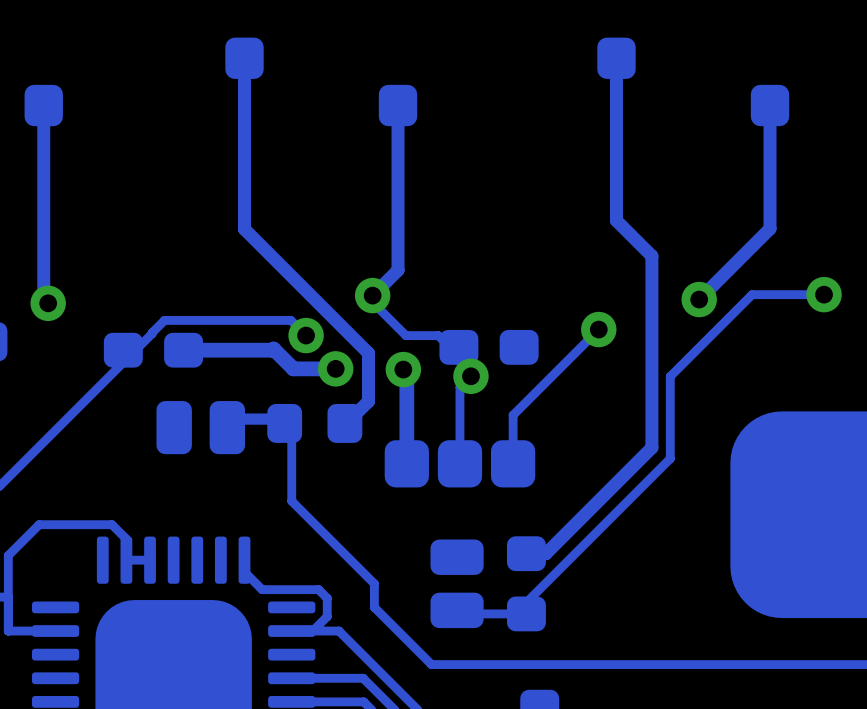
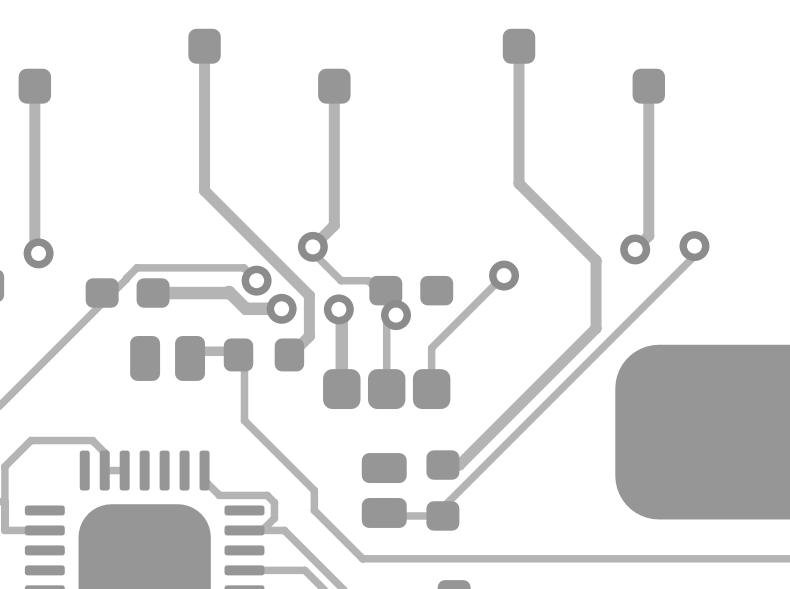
track: (770, 228) (699, 299) -> (648, 190) (648, 235) (635, 249)
track: (651, 256) (651, 447) -> (548, 213) (596, 260) (596, 328) (548, 375)
track: (824, 294) (752, 294) (670, 376) (670, 458) (526, 602) -> (694, 246) (694, 255) (442, 507)
via position: (699, 299) -> (635, 249)

